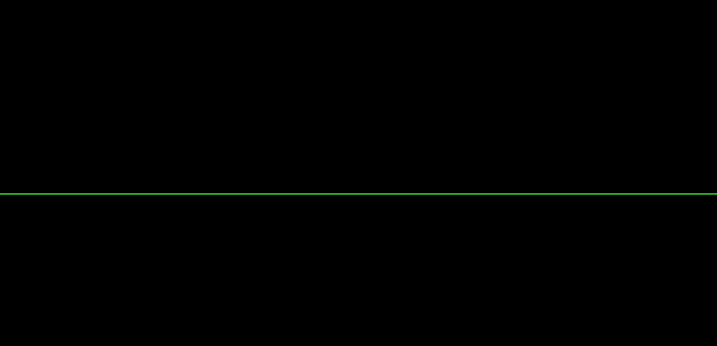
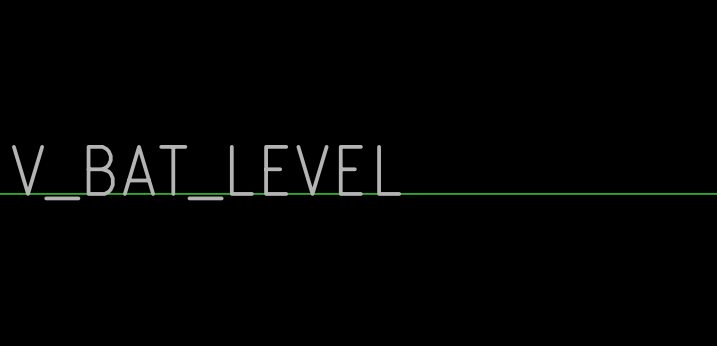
label: none -> V_BAT_LEVEL (206, 172)

